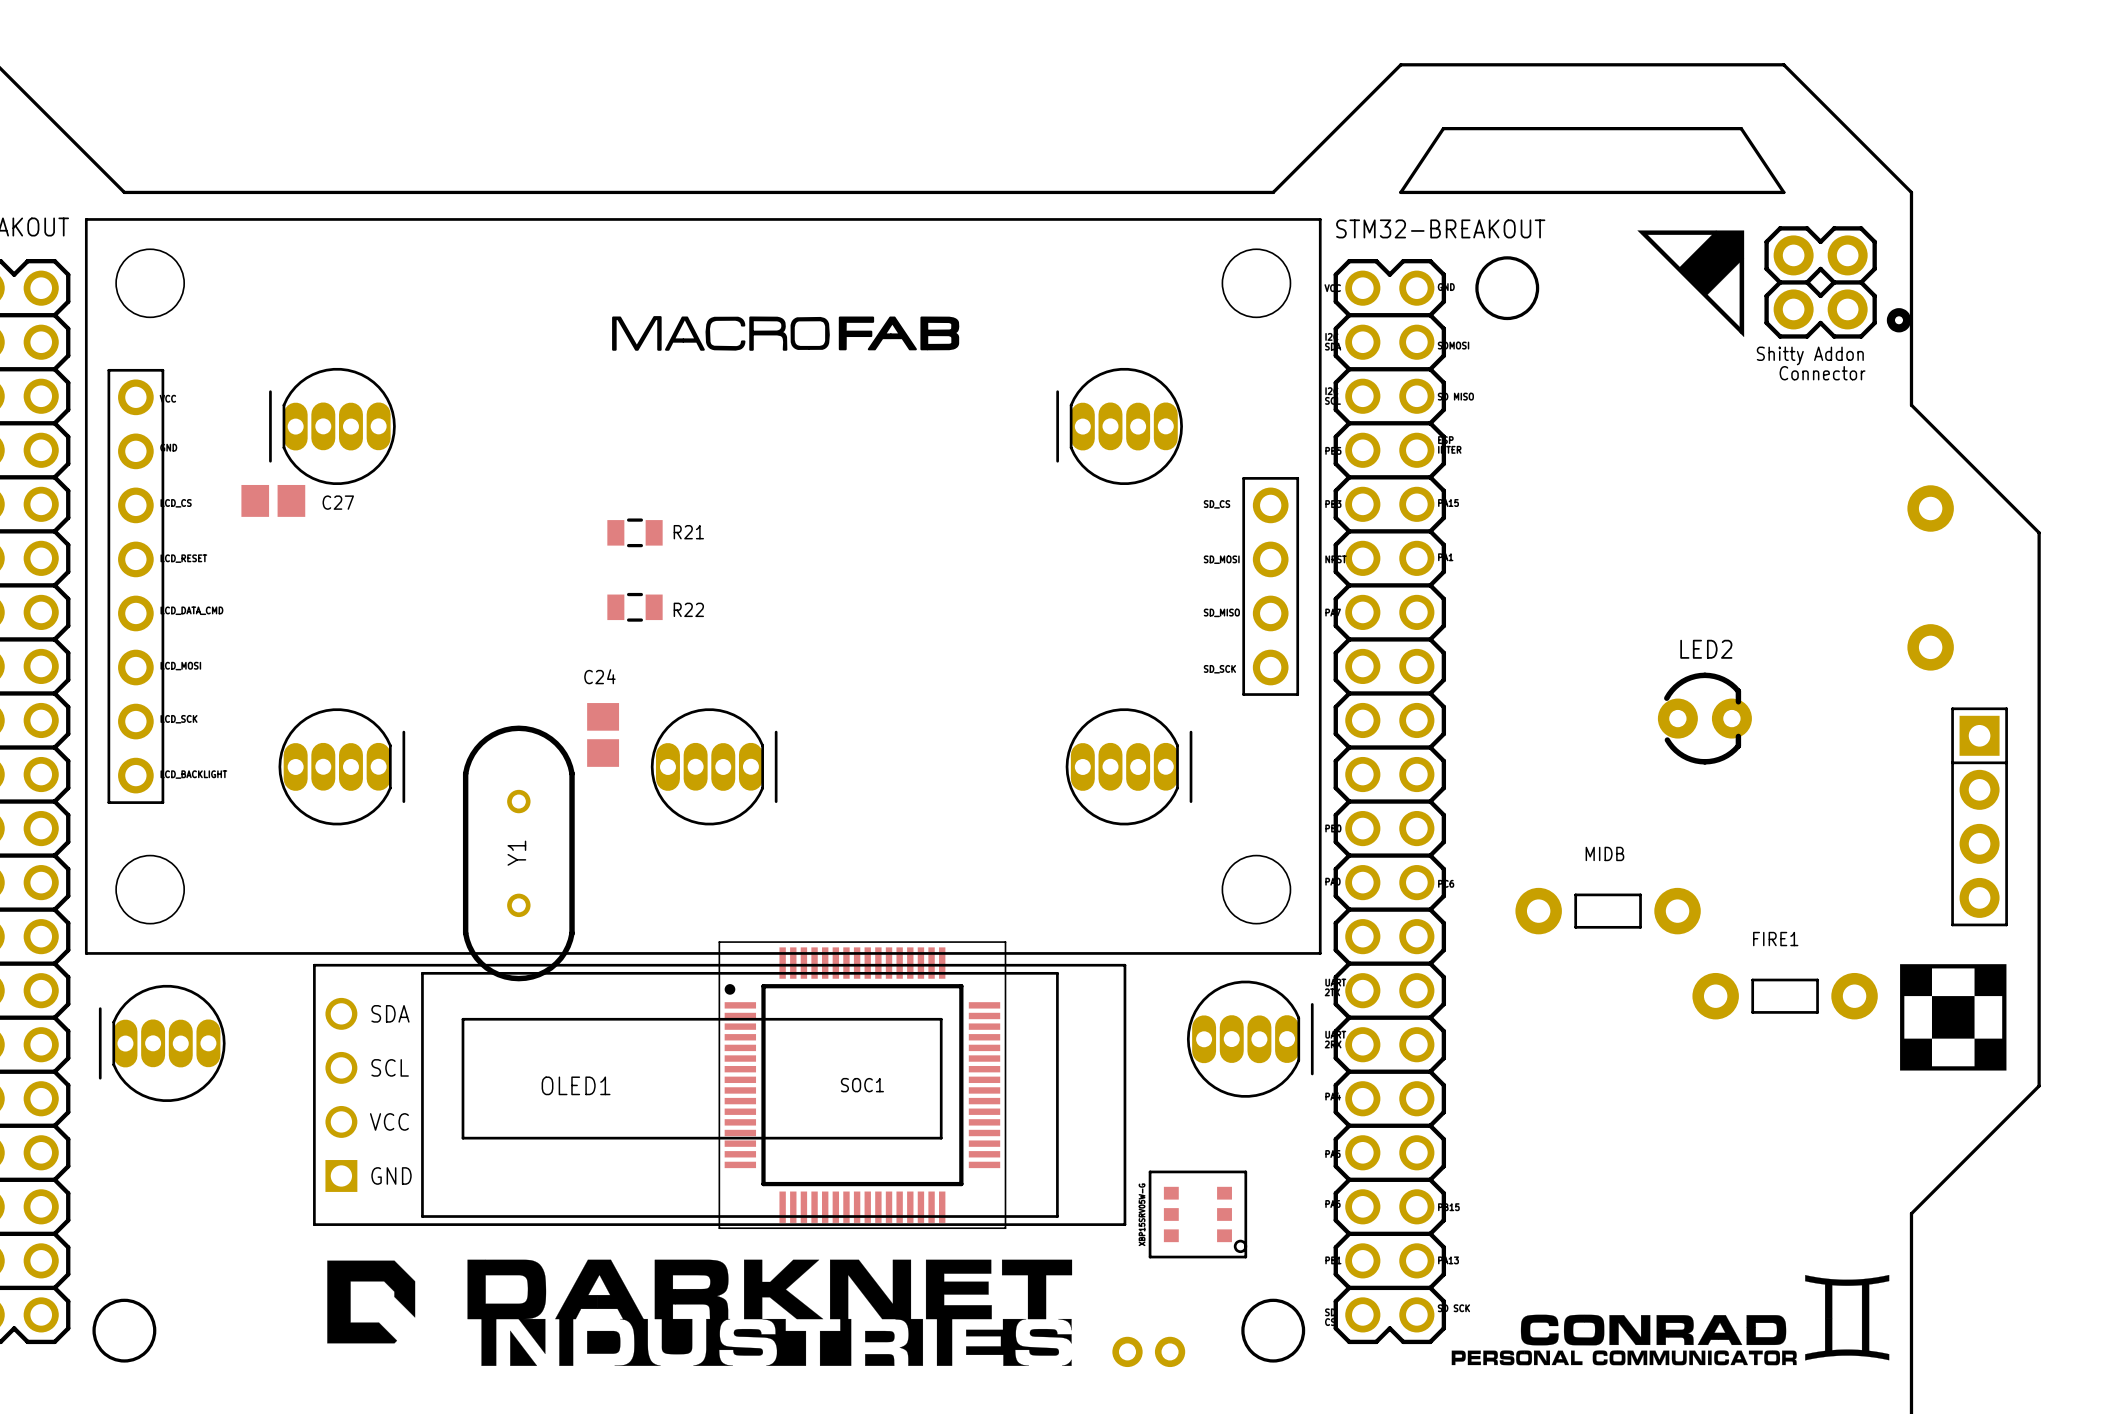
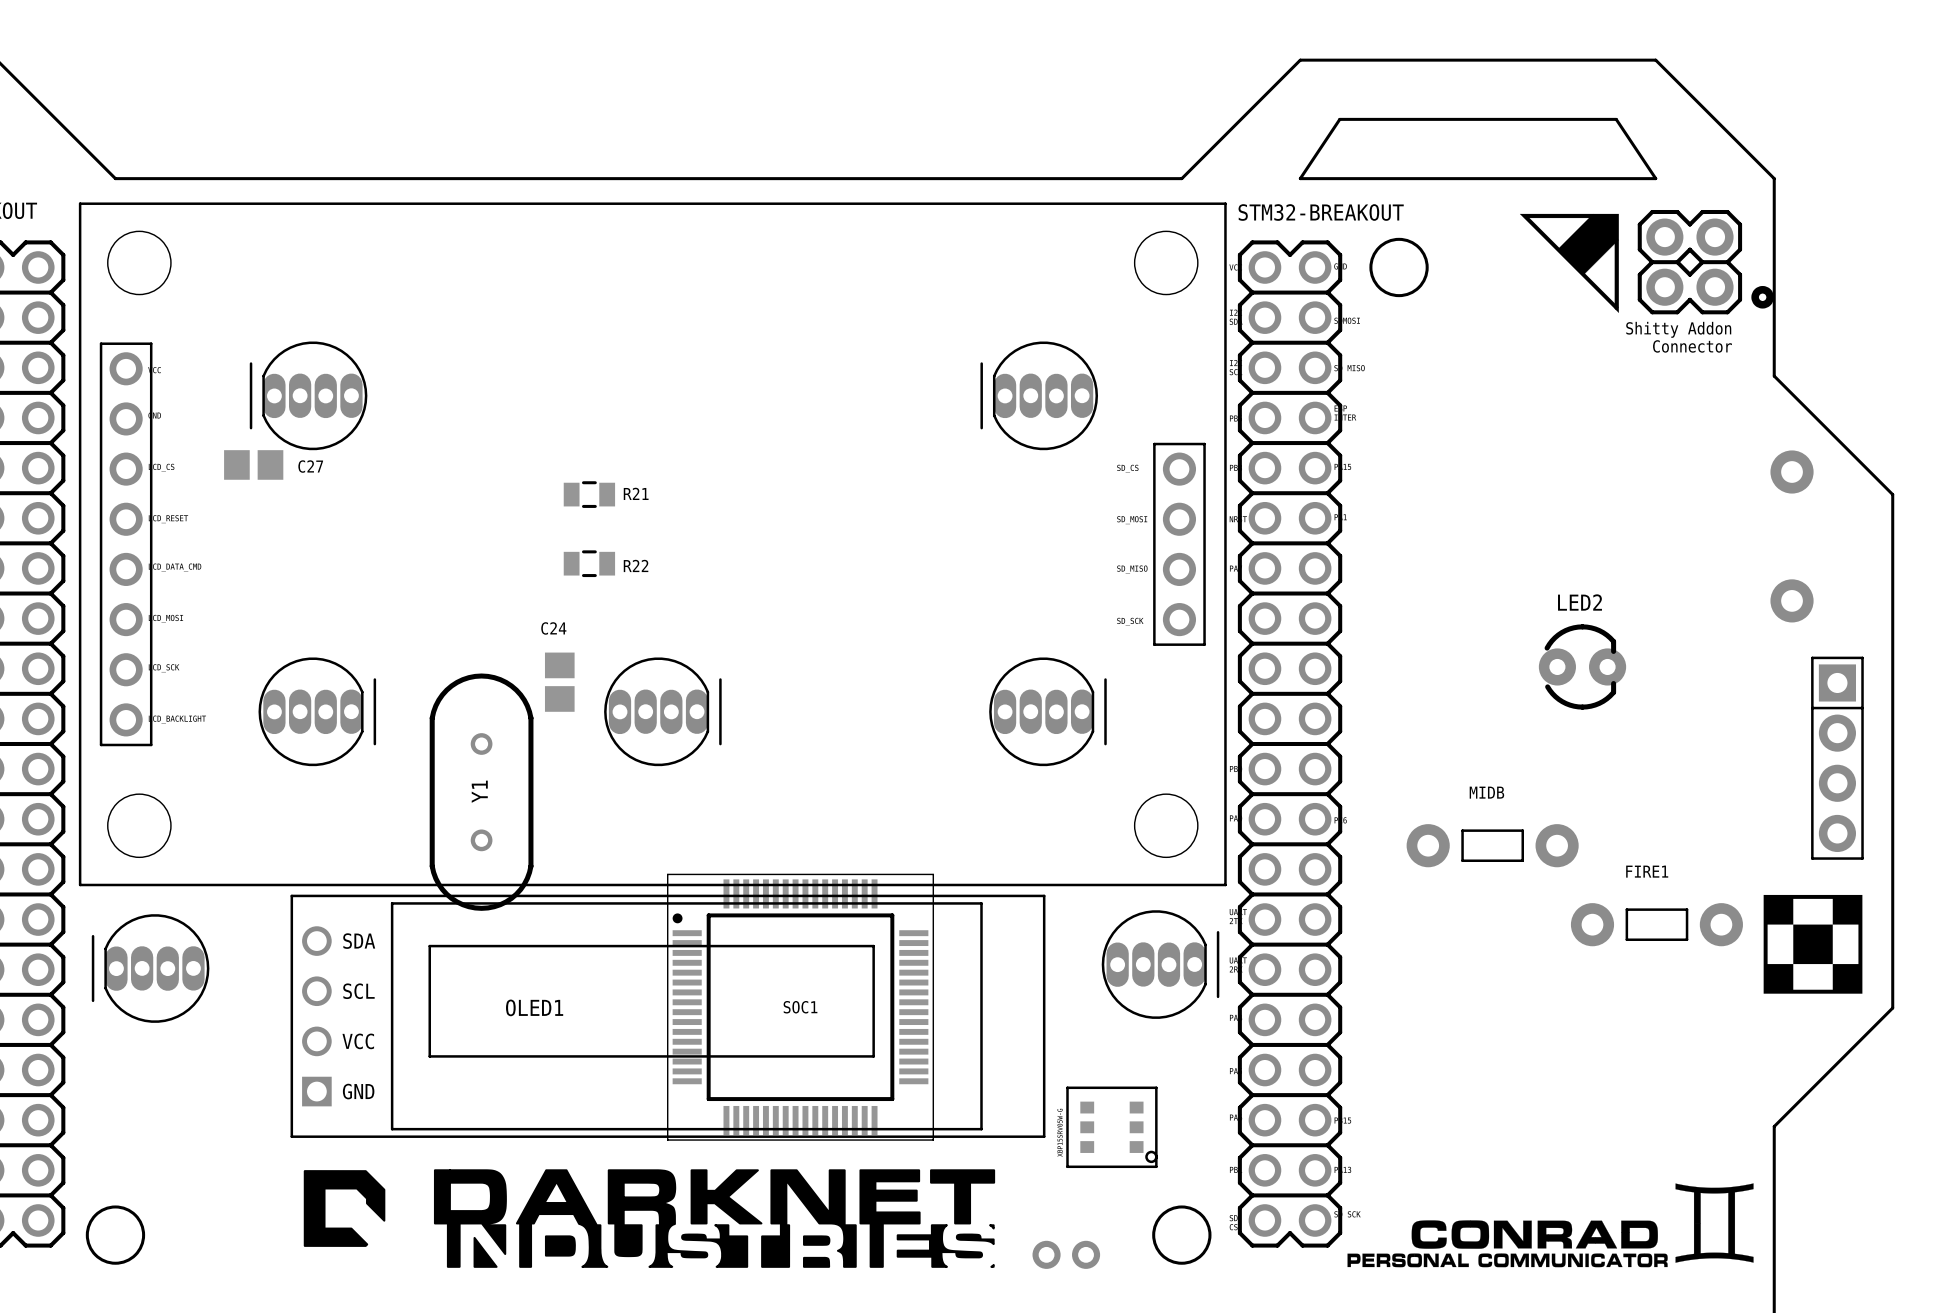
drawing: [612, 316, 960, 351] -> none
drawing shape: [327, 1259, 1073, 1366] -> [303, 1169, 996, 1268]

